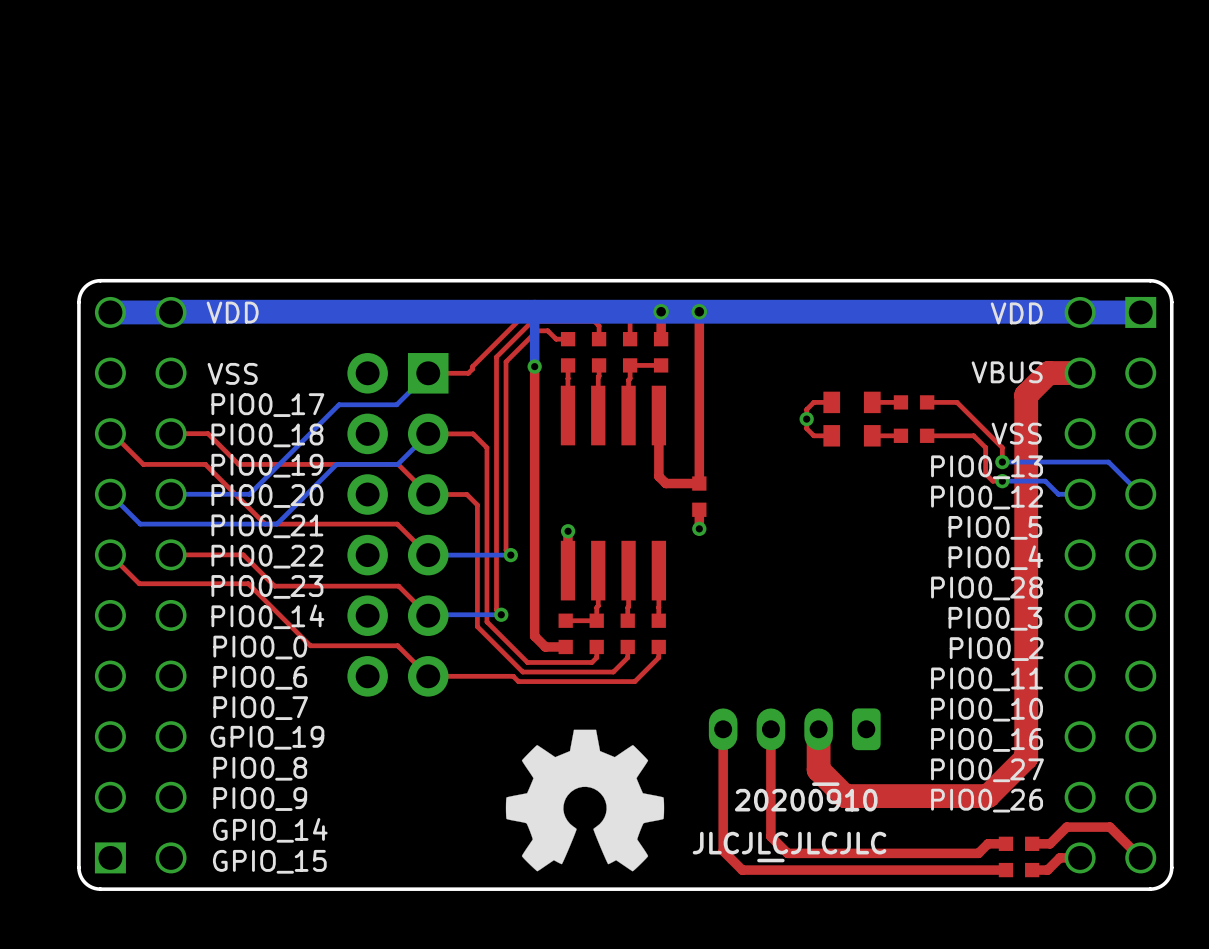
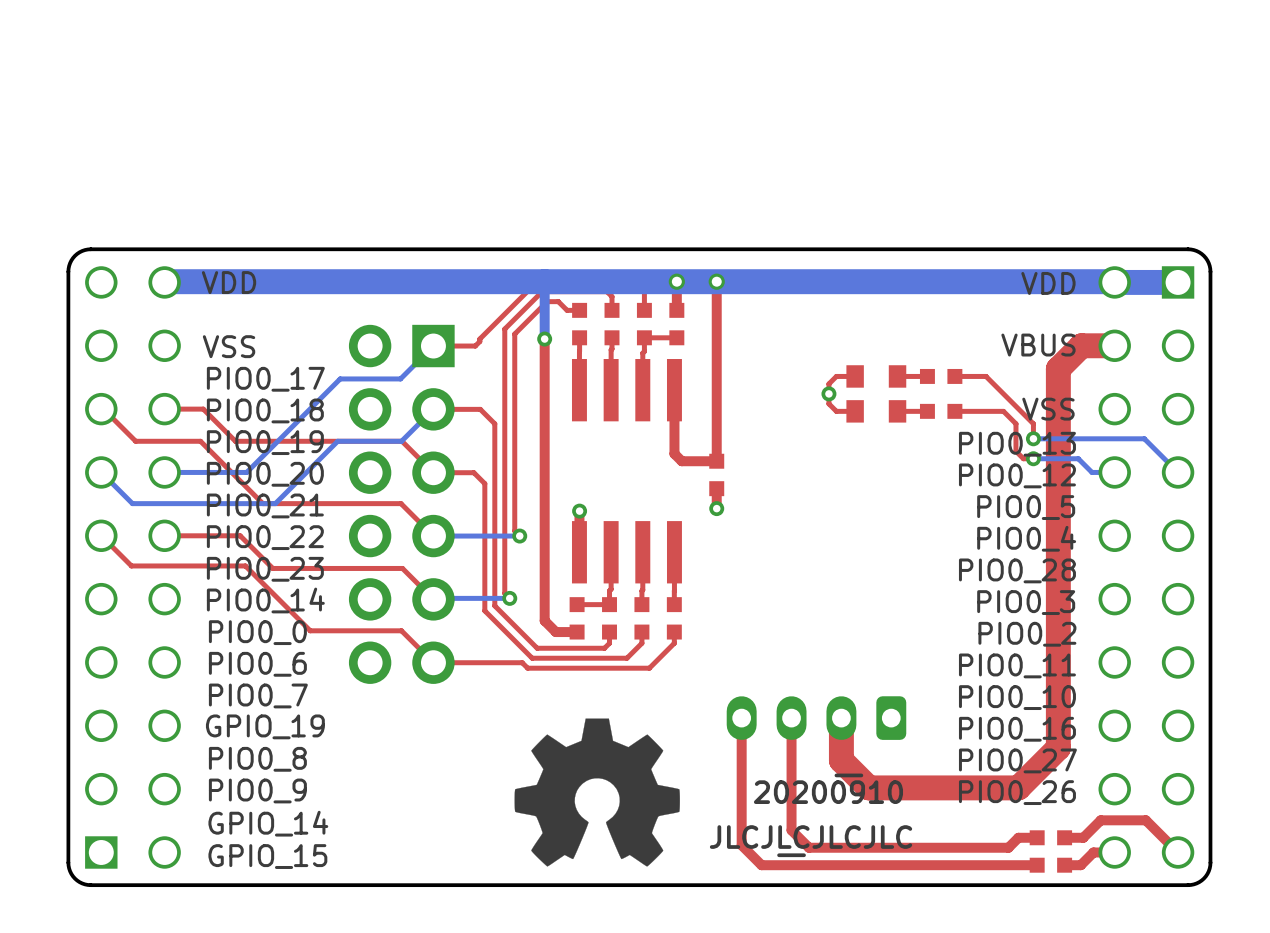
bottom track: (171, 312) (110, 312) -> none

